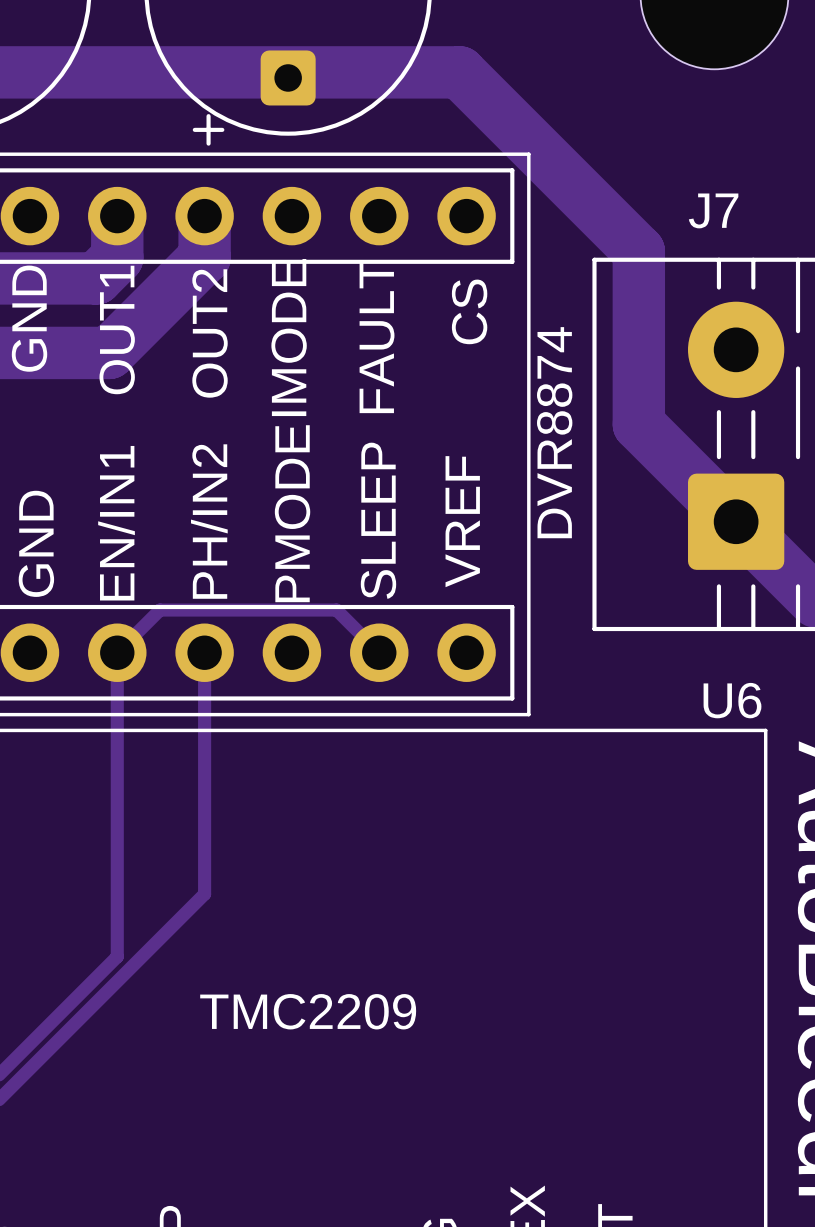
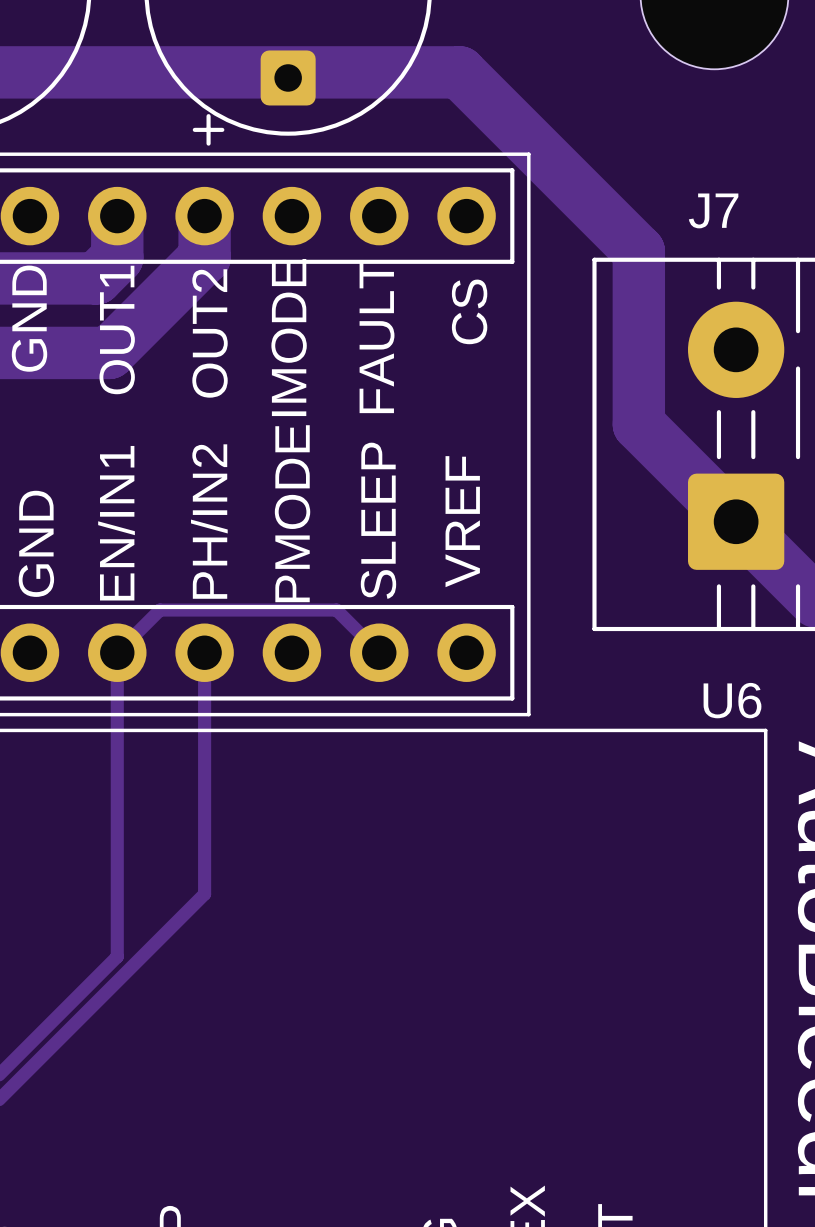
part value: DVR8874 (554, 432) -> none
U6 value: TMC2209 (308, 1011) -> none

